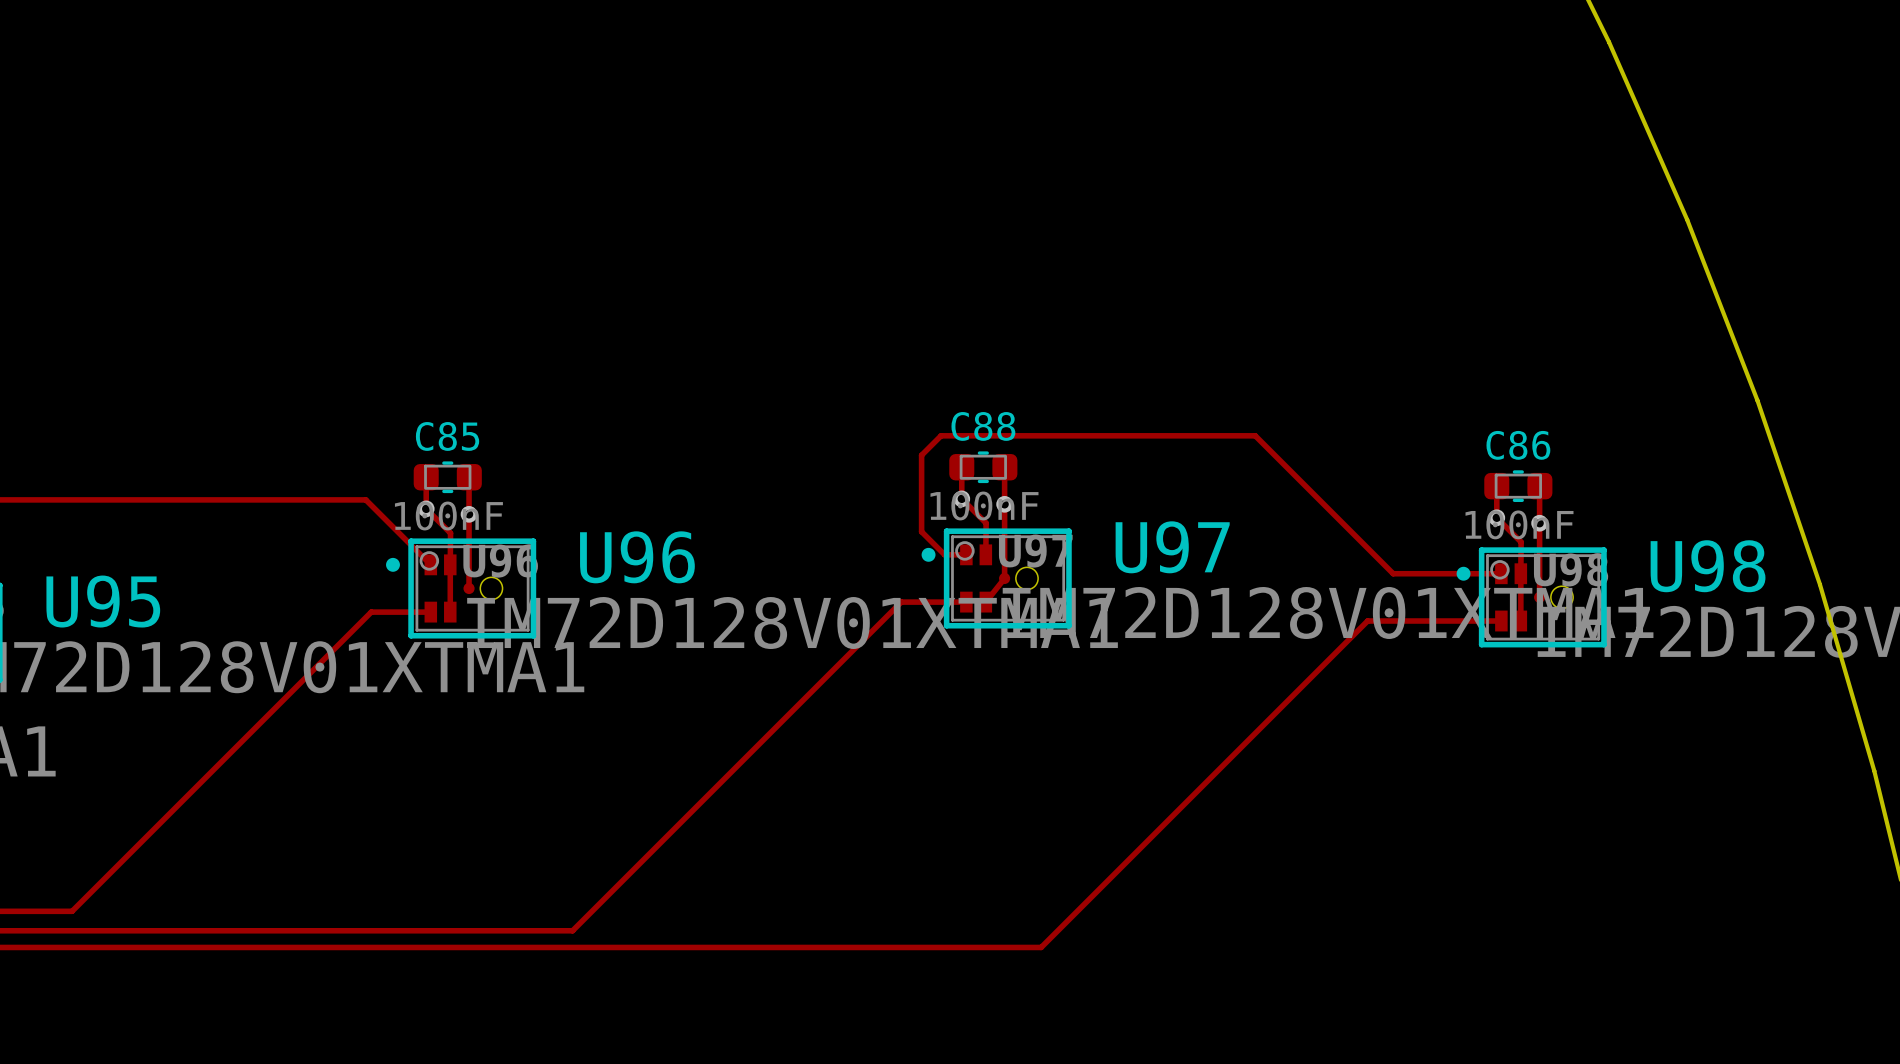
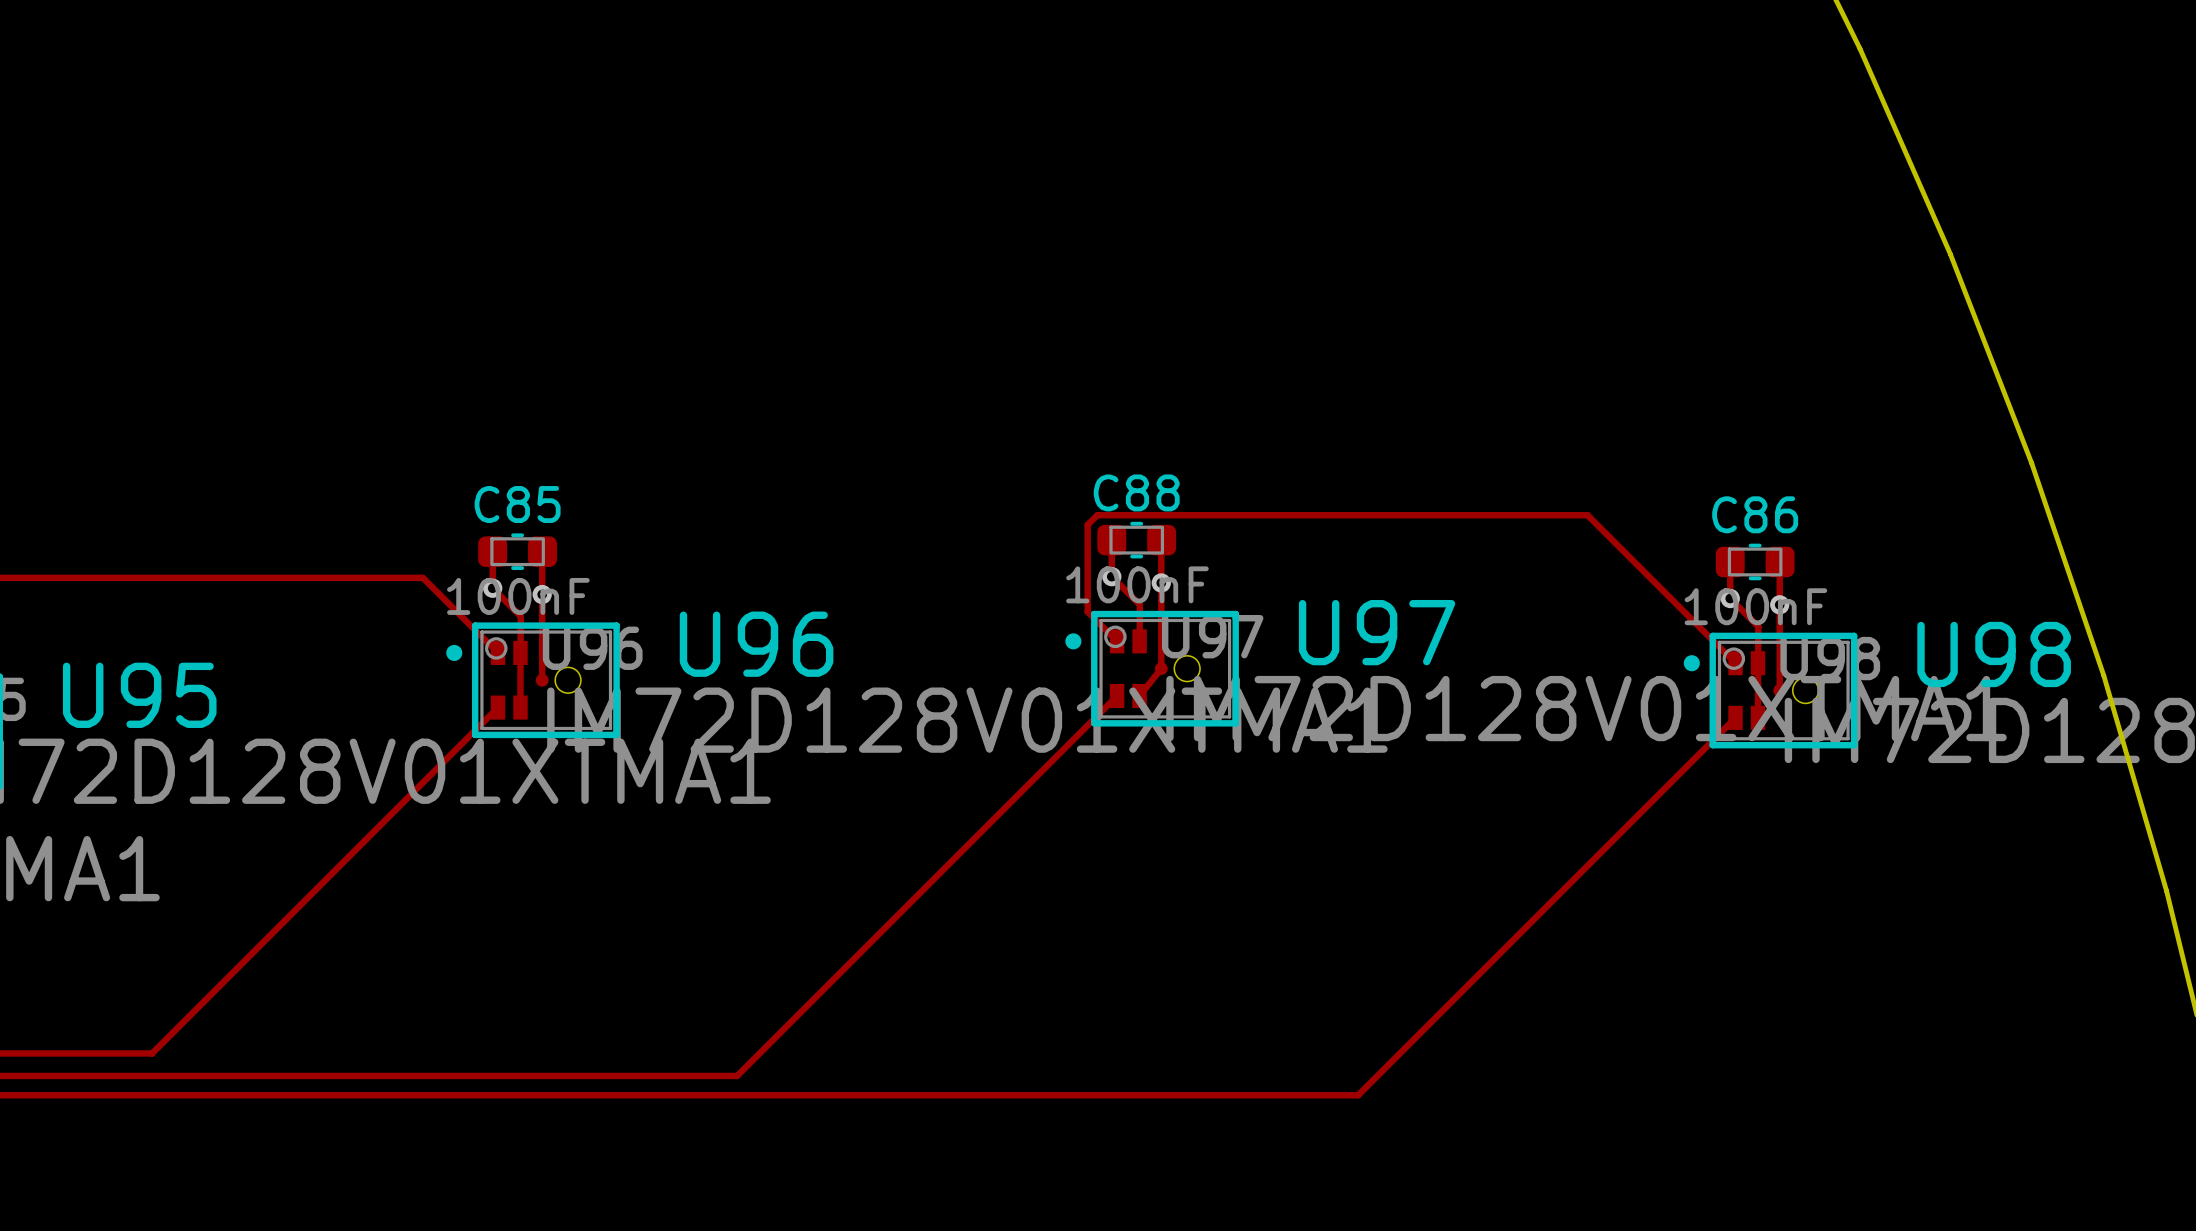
top track: (966, 554) (944, 554) (921, 531) (921, 455) (941, 435) (1255, 435) (1393, 573) (1501, 573) -> (1117, 641) (1087, 611) (1087, 524) (1097, 515) (1587, 515) (1735, 663)
top track: (966, 602) (901, 602) (572, 930) -> (1117, 696) (737, 1075) (661, 1075)
top track: (430, 612) (371, 612) (72, 911) -> (498, 707) (152, 1053) (83, 1053)
top track: (1501, 621) (1367, 621) (1041, 947) -> (1735, 717) (1358, 1095) (1203, 1095)

